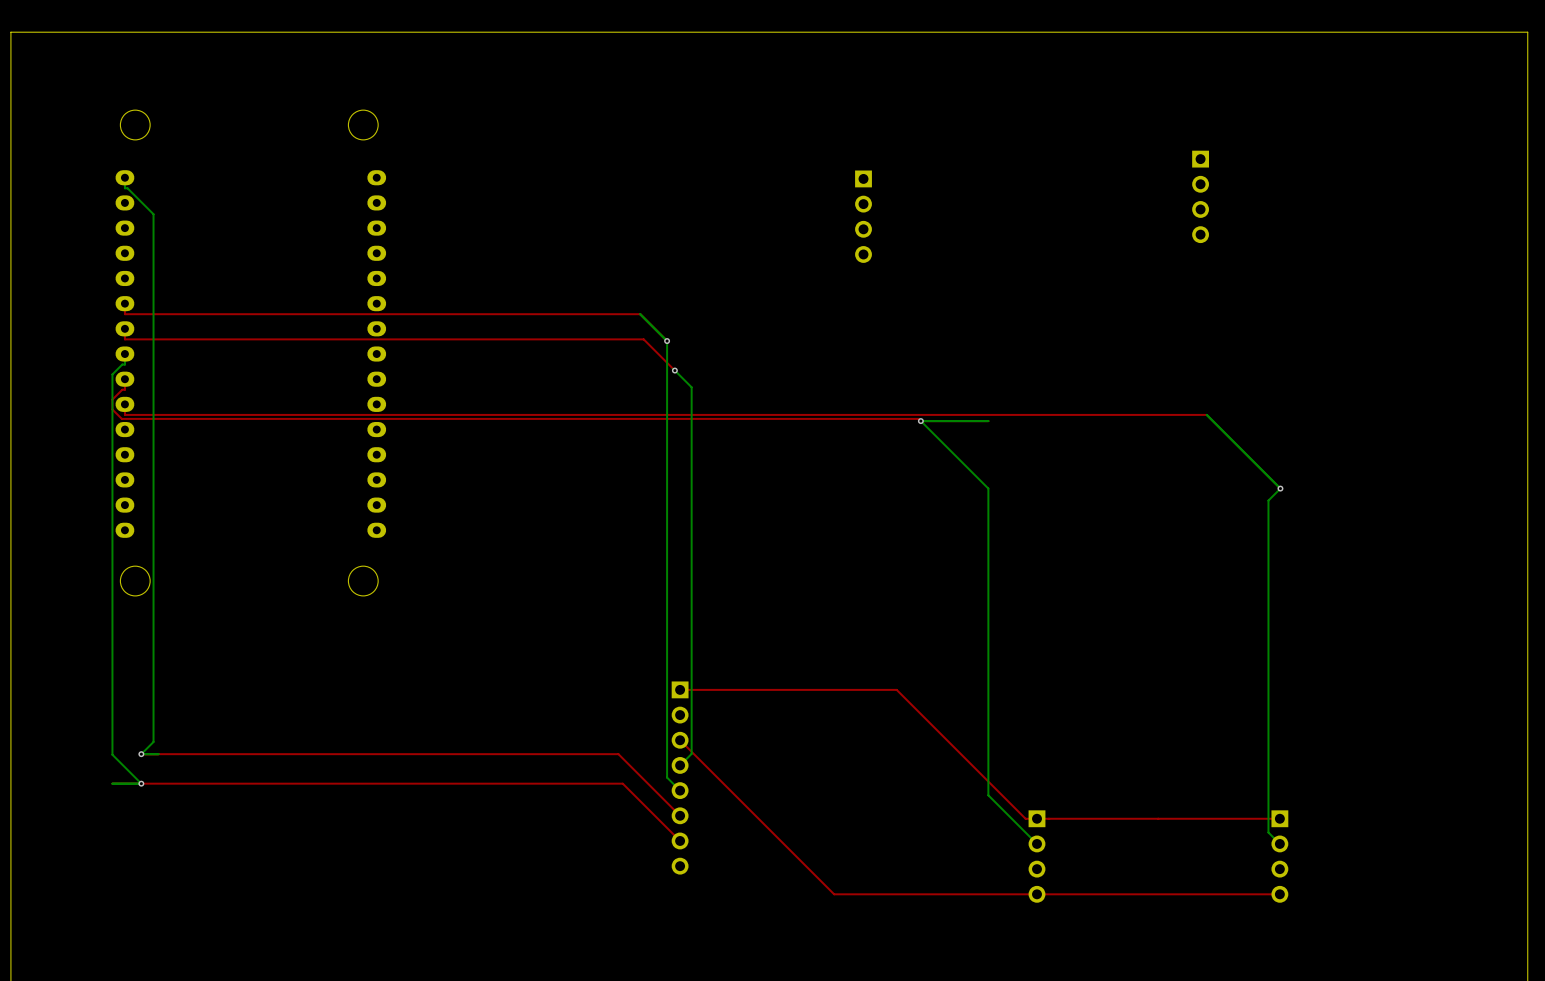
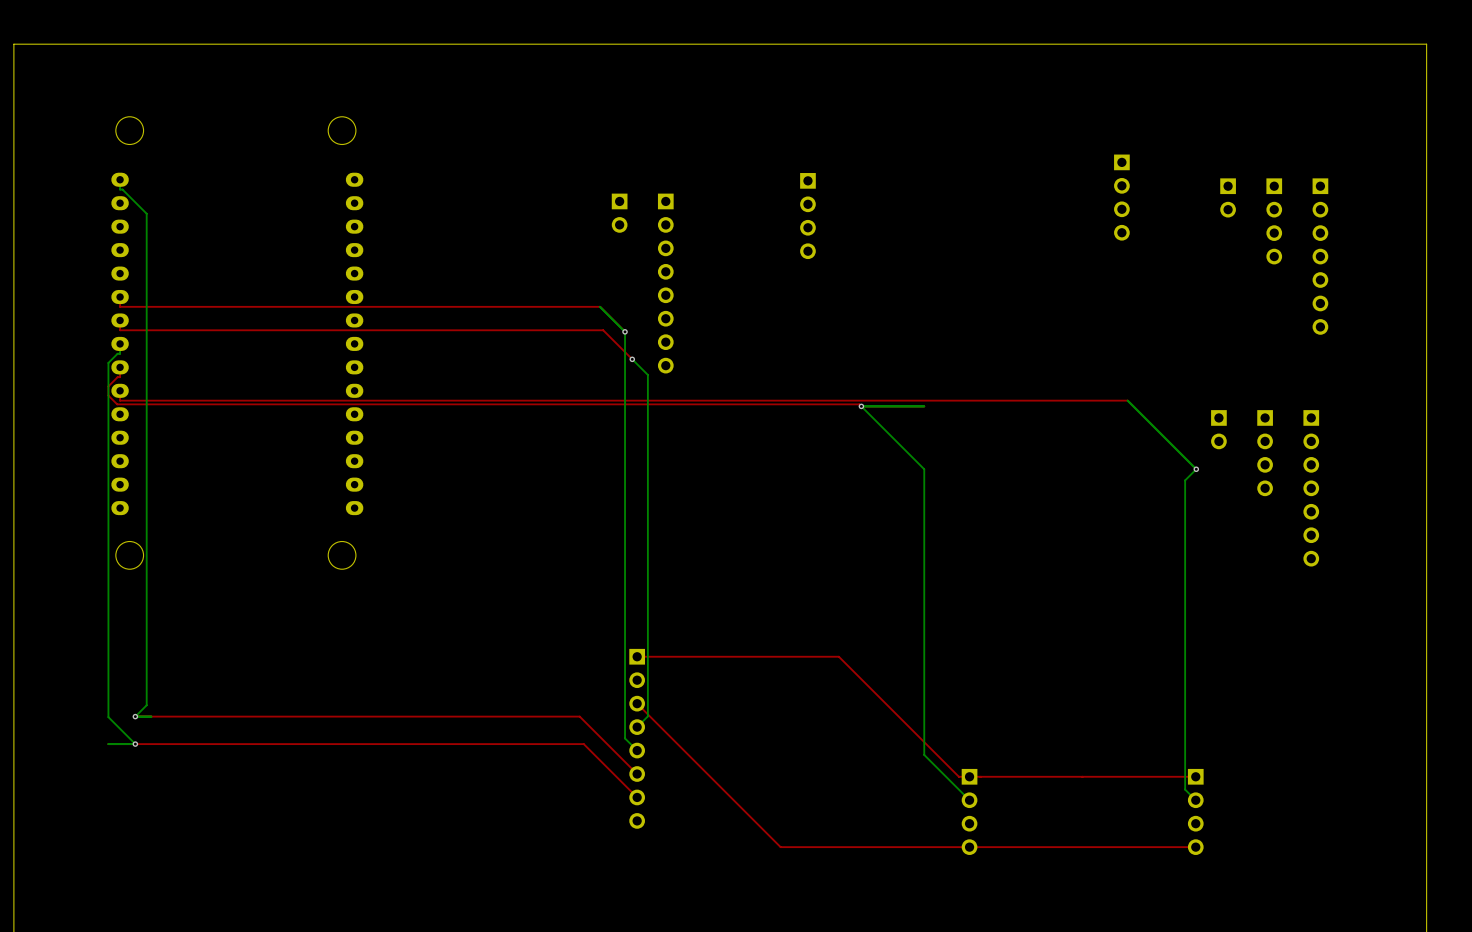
part: none -> (1228, 197)
part: none -> (619, 213)
part: none -> (1274, 221)
part: none -> (1320, 256)
part: none -> (665, 283)
part: none -> (1218, 429)
part: none -> (1265, 453)
part: none -> (1311, 488)

